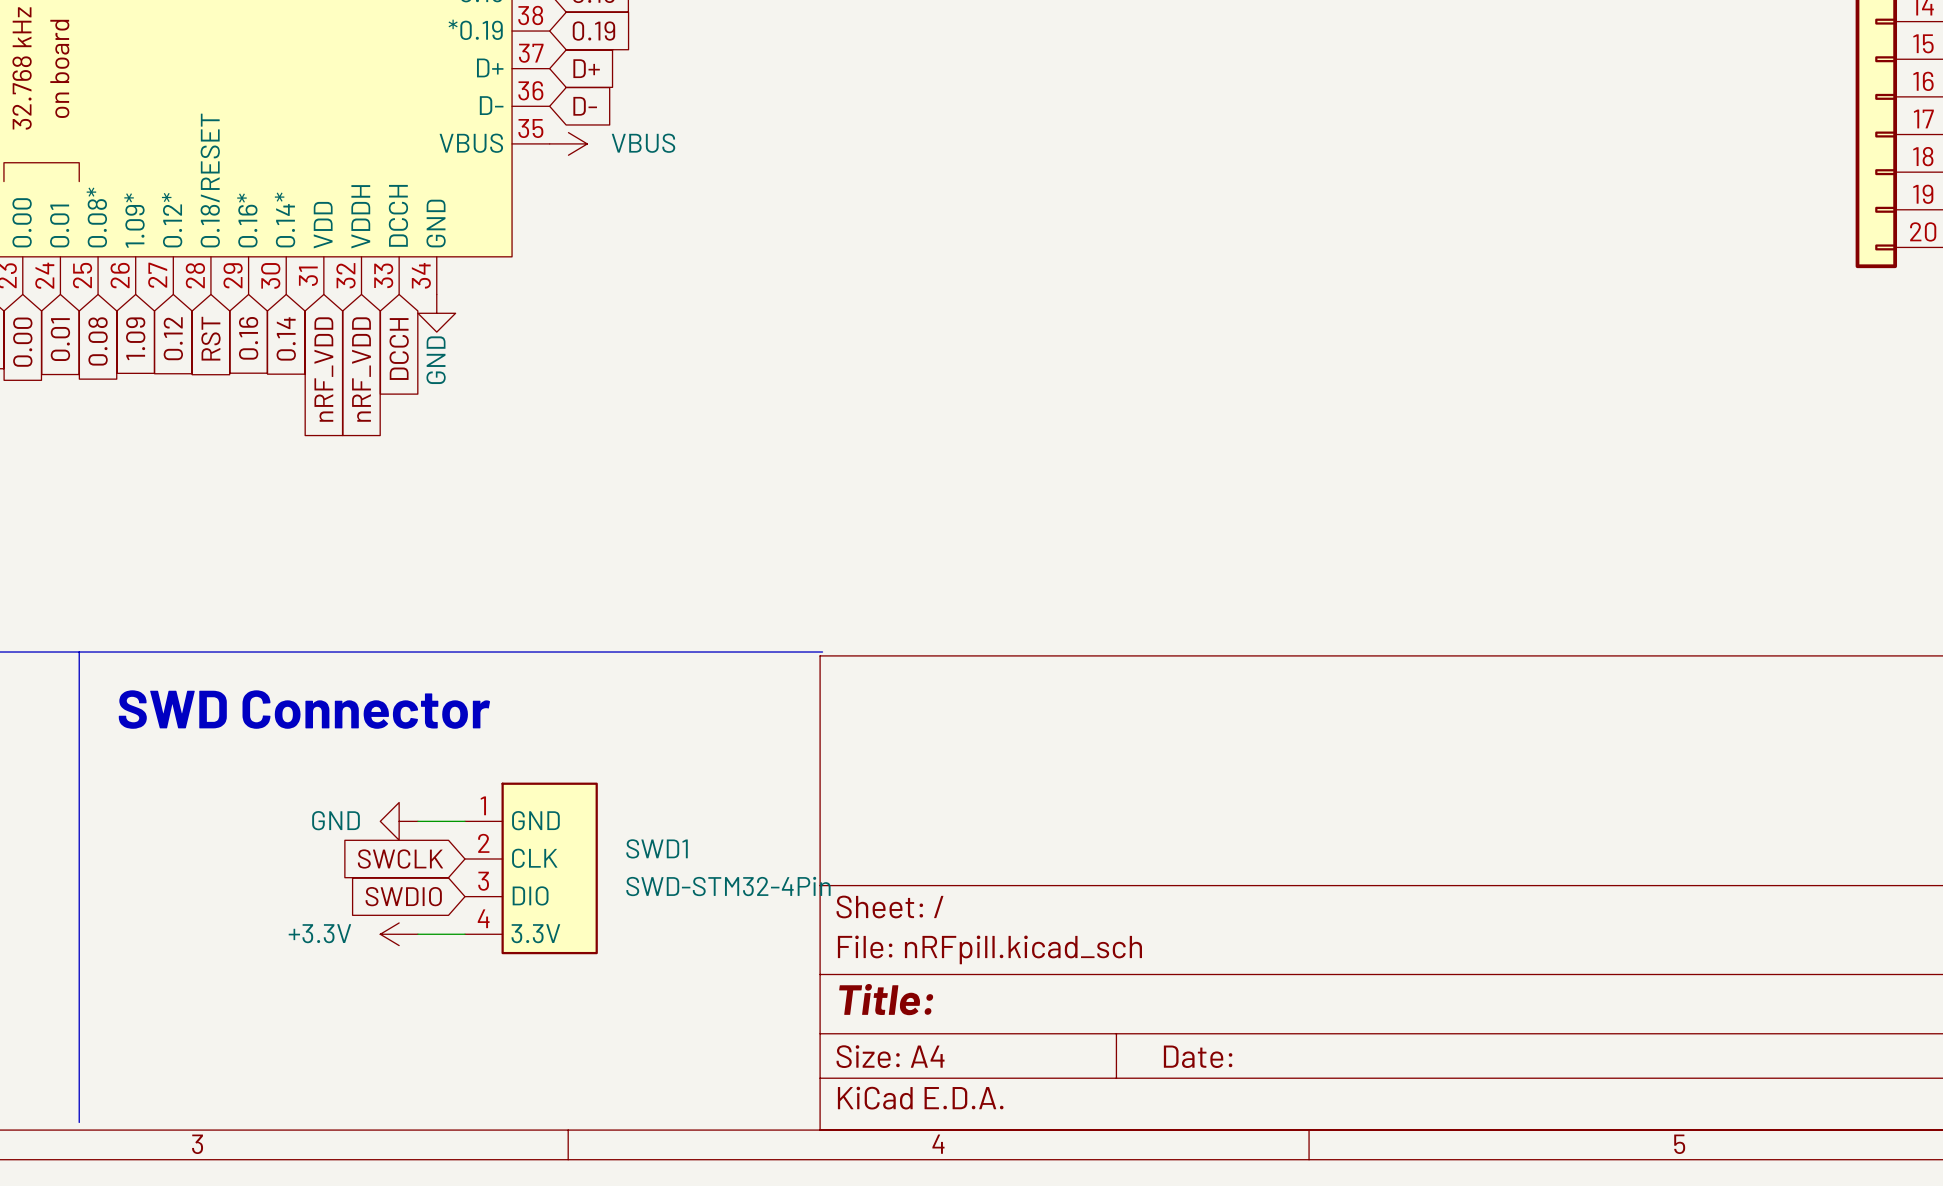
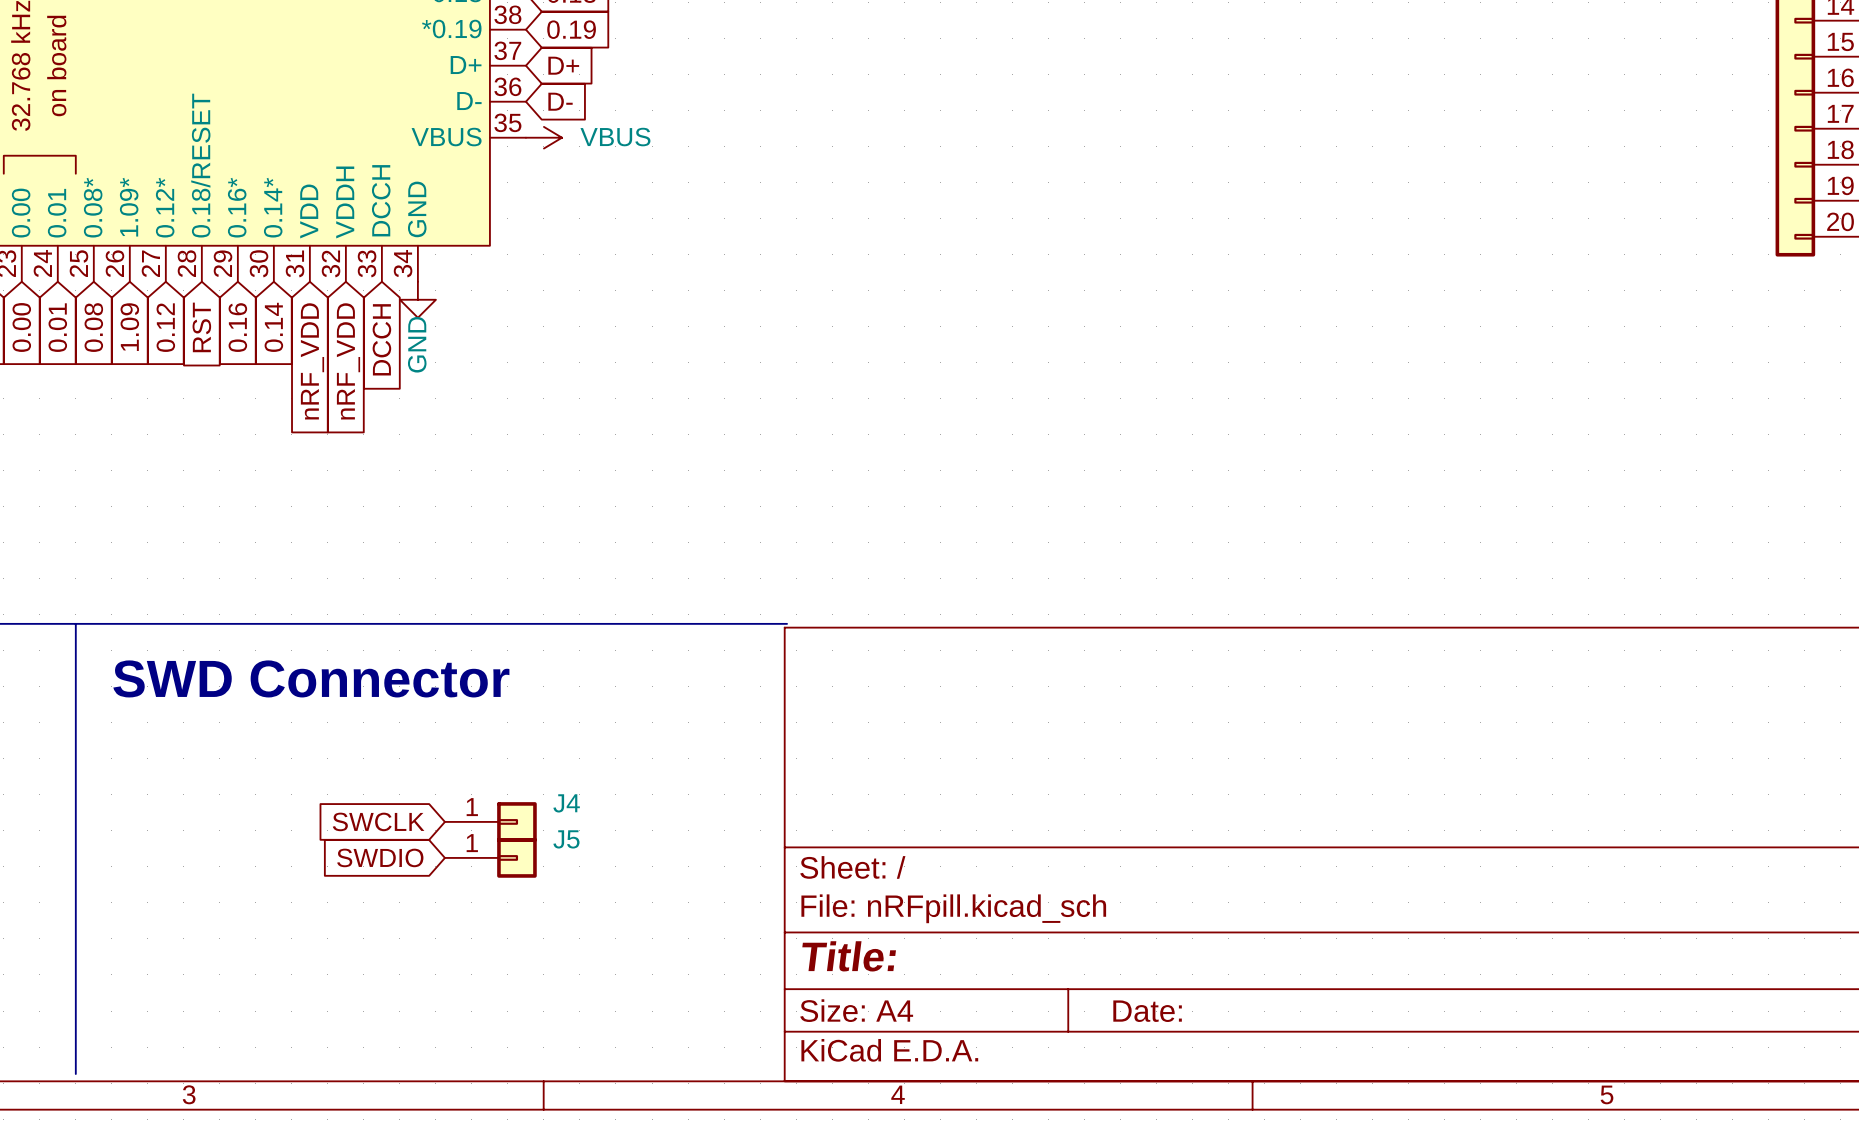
power symbol: GND (399, 821) -> none
wire: (417, 821) (464, 821) -> none
J4: none -> (490, 821)
SWD1: SWD-STM32-4Pin (531, 868) -> none
J5: none -> (490, 857)
power symbol: +3.3V (399, 934) -> none
wire: (417, 934) (464, 934) -> none

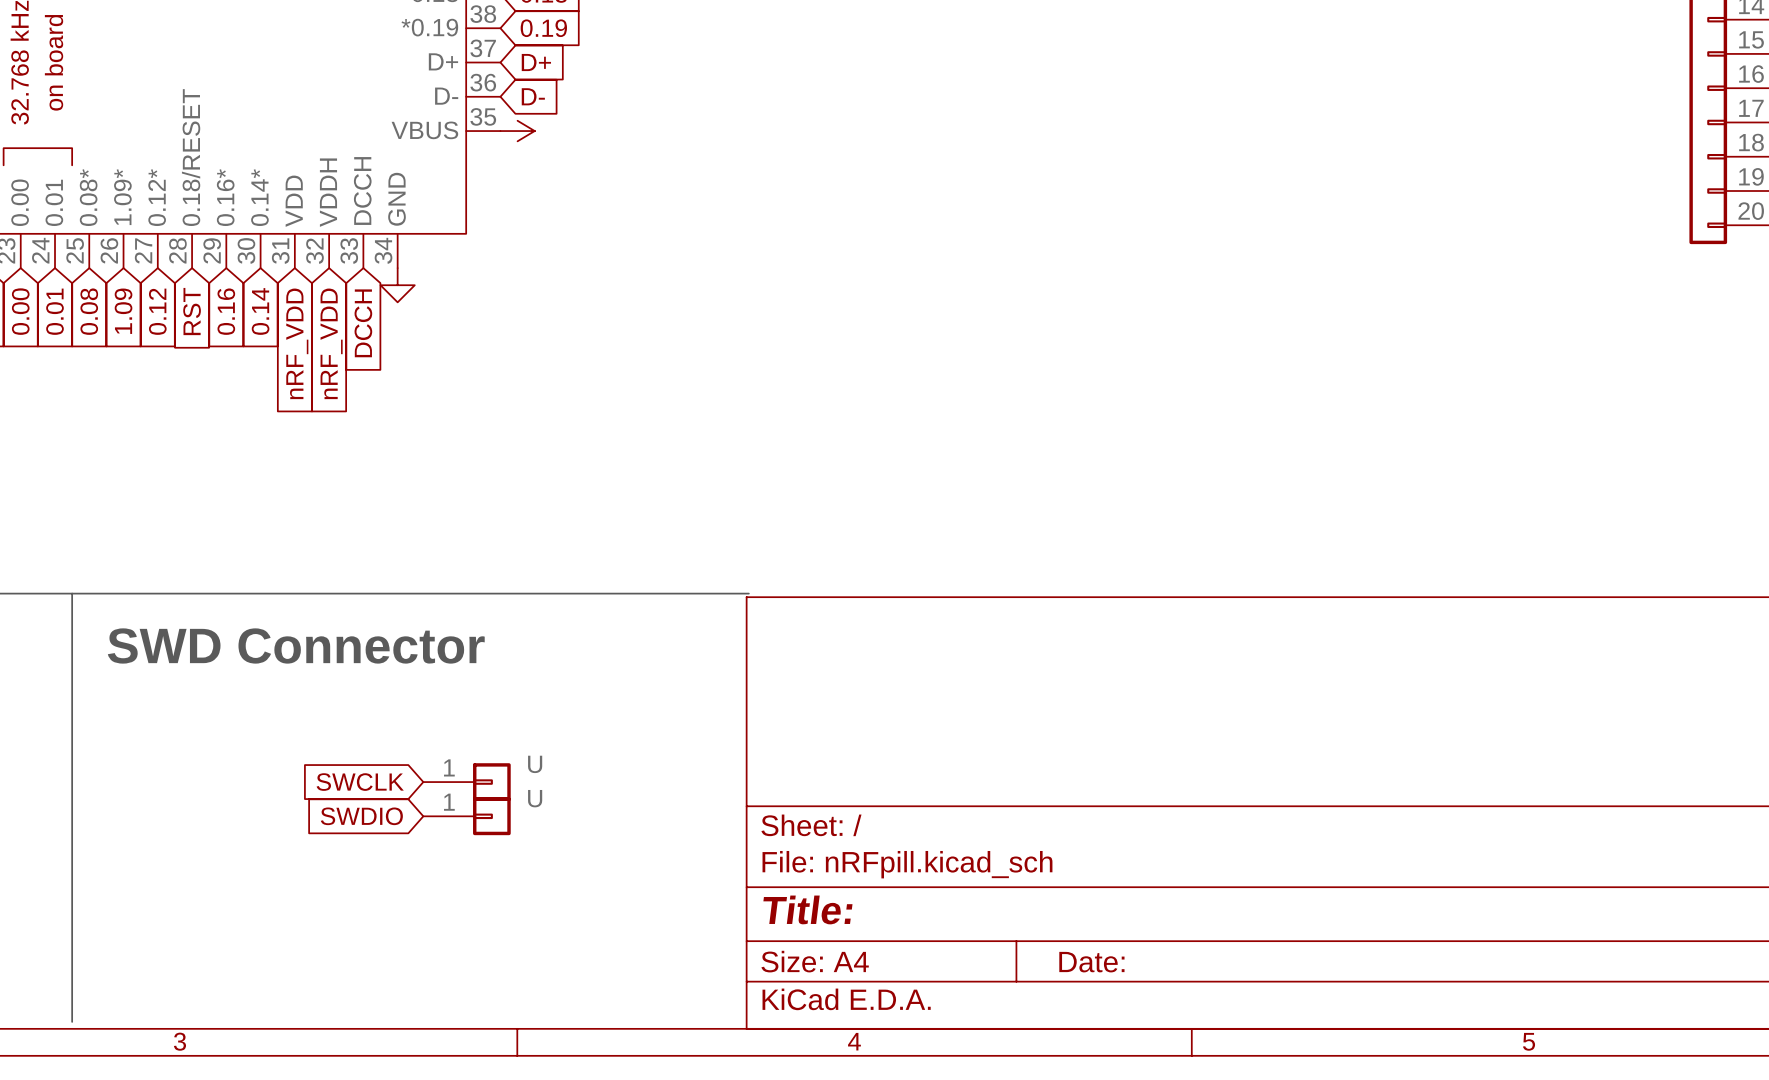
power symbol text: VBUS (615, 137) -> none
power symbol text: GND (417, 344) -> none
J4 name: J4 (566, 803) -> U (535, 764)
J5 name: J5 (566, 839) -> U (535, 798)

